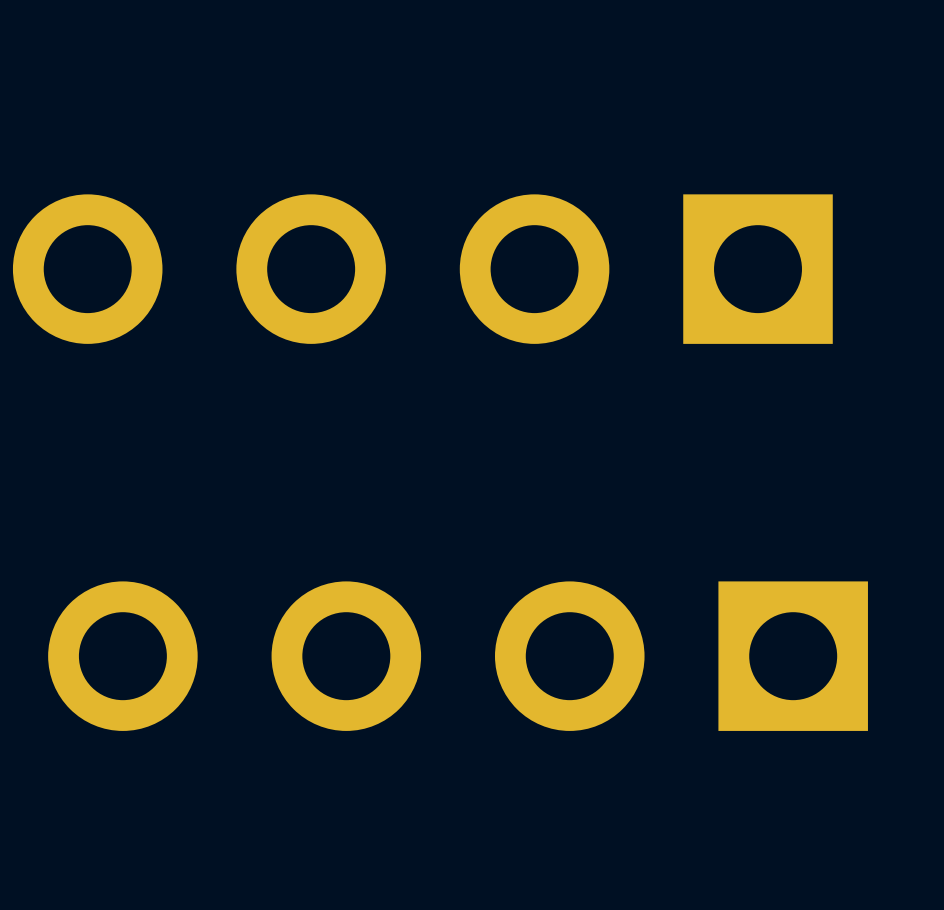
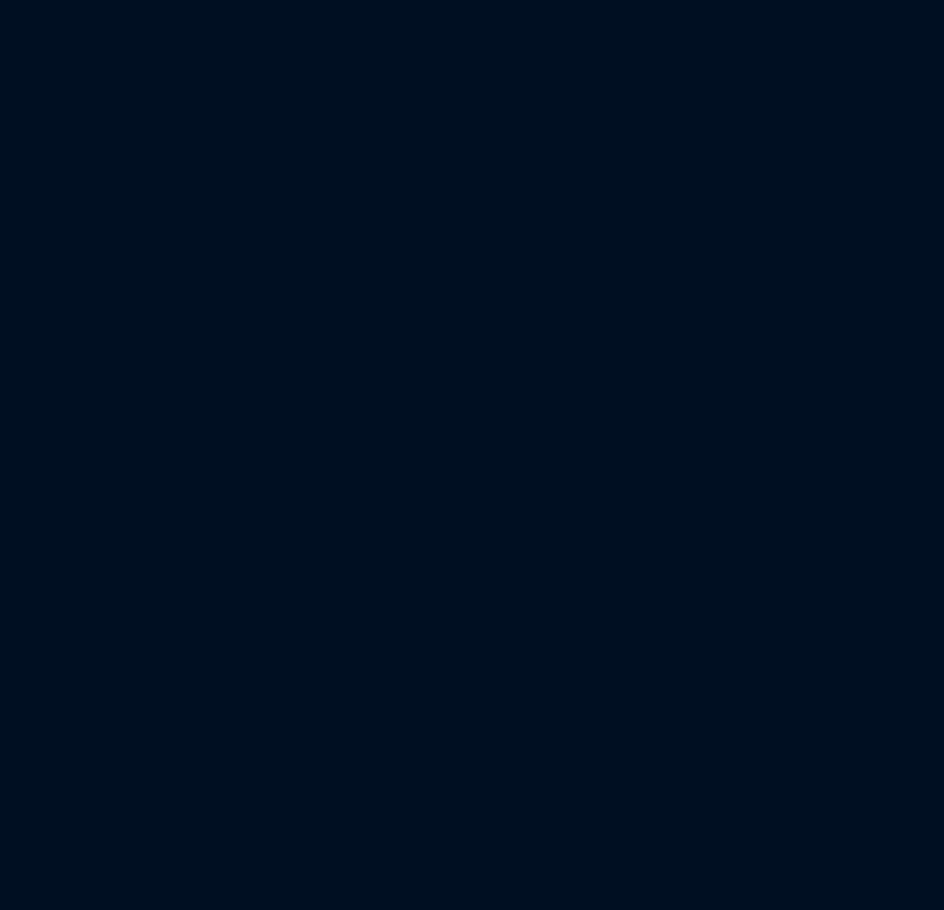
part: (422, 269) -> none
part: (458, 656) -> none

